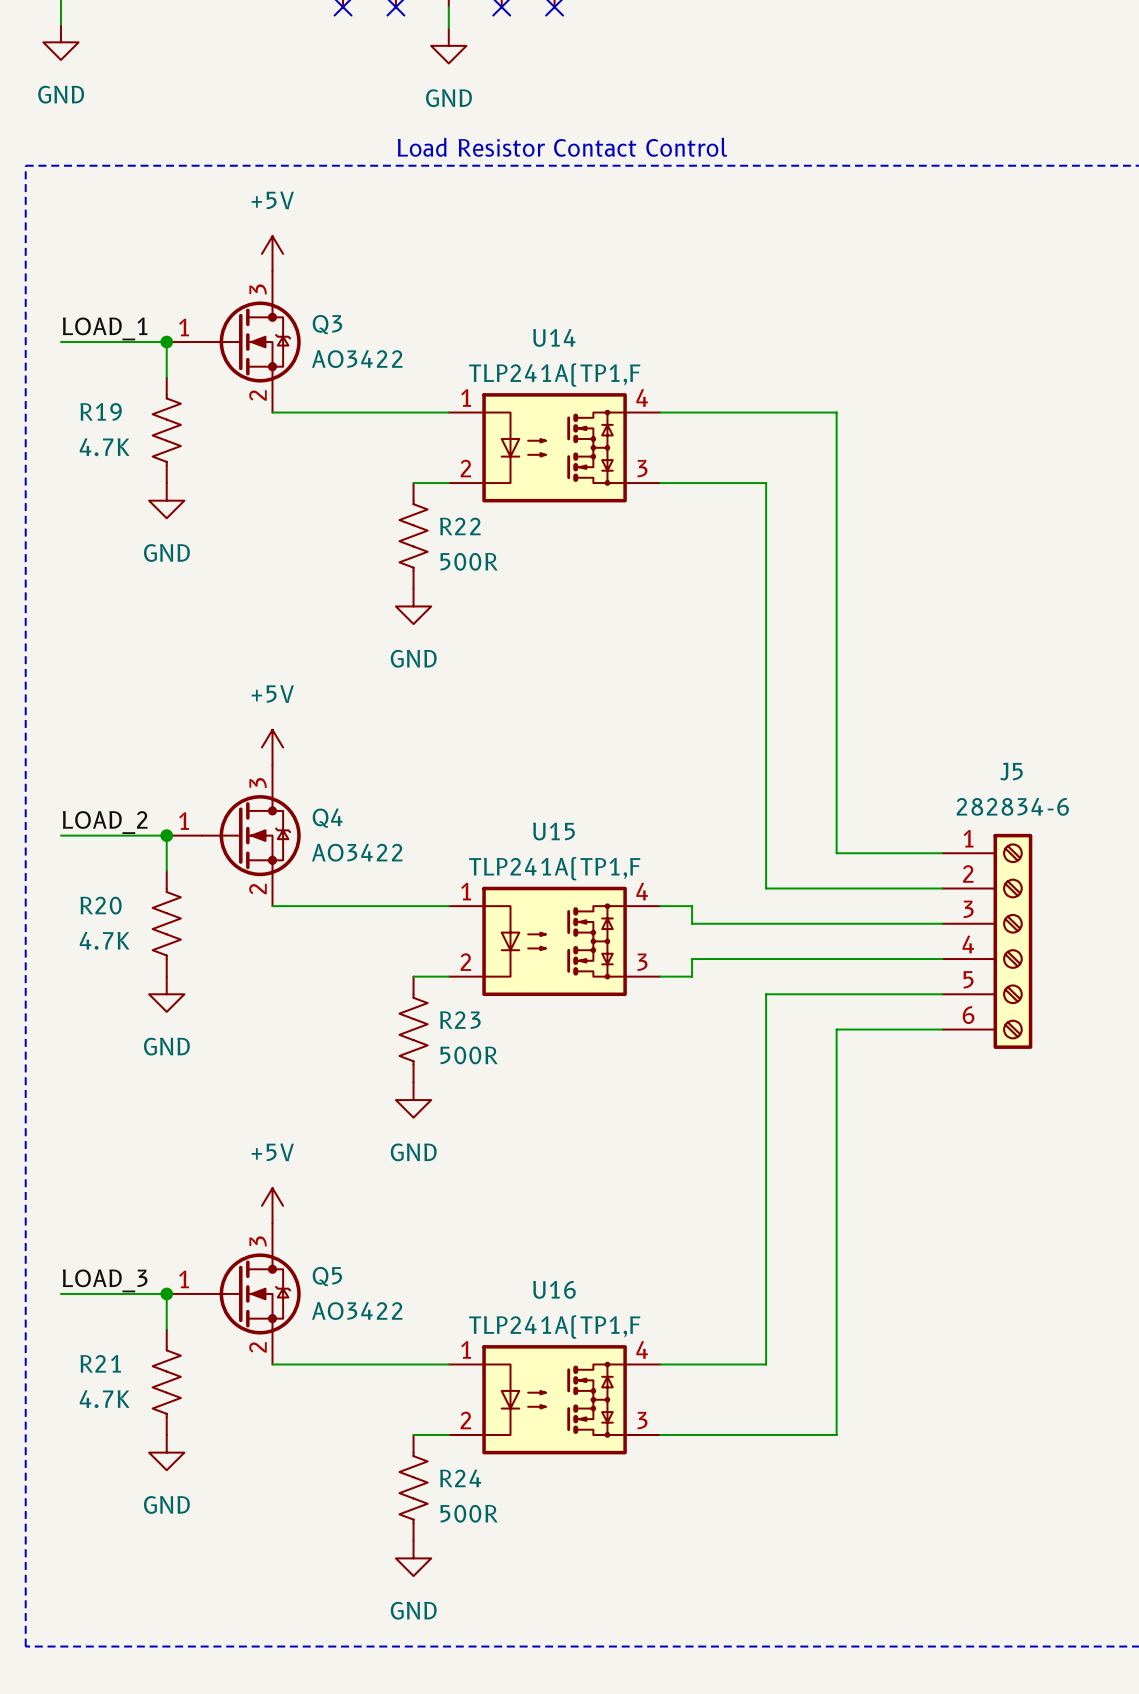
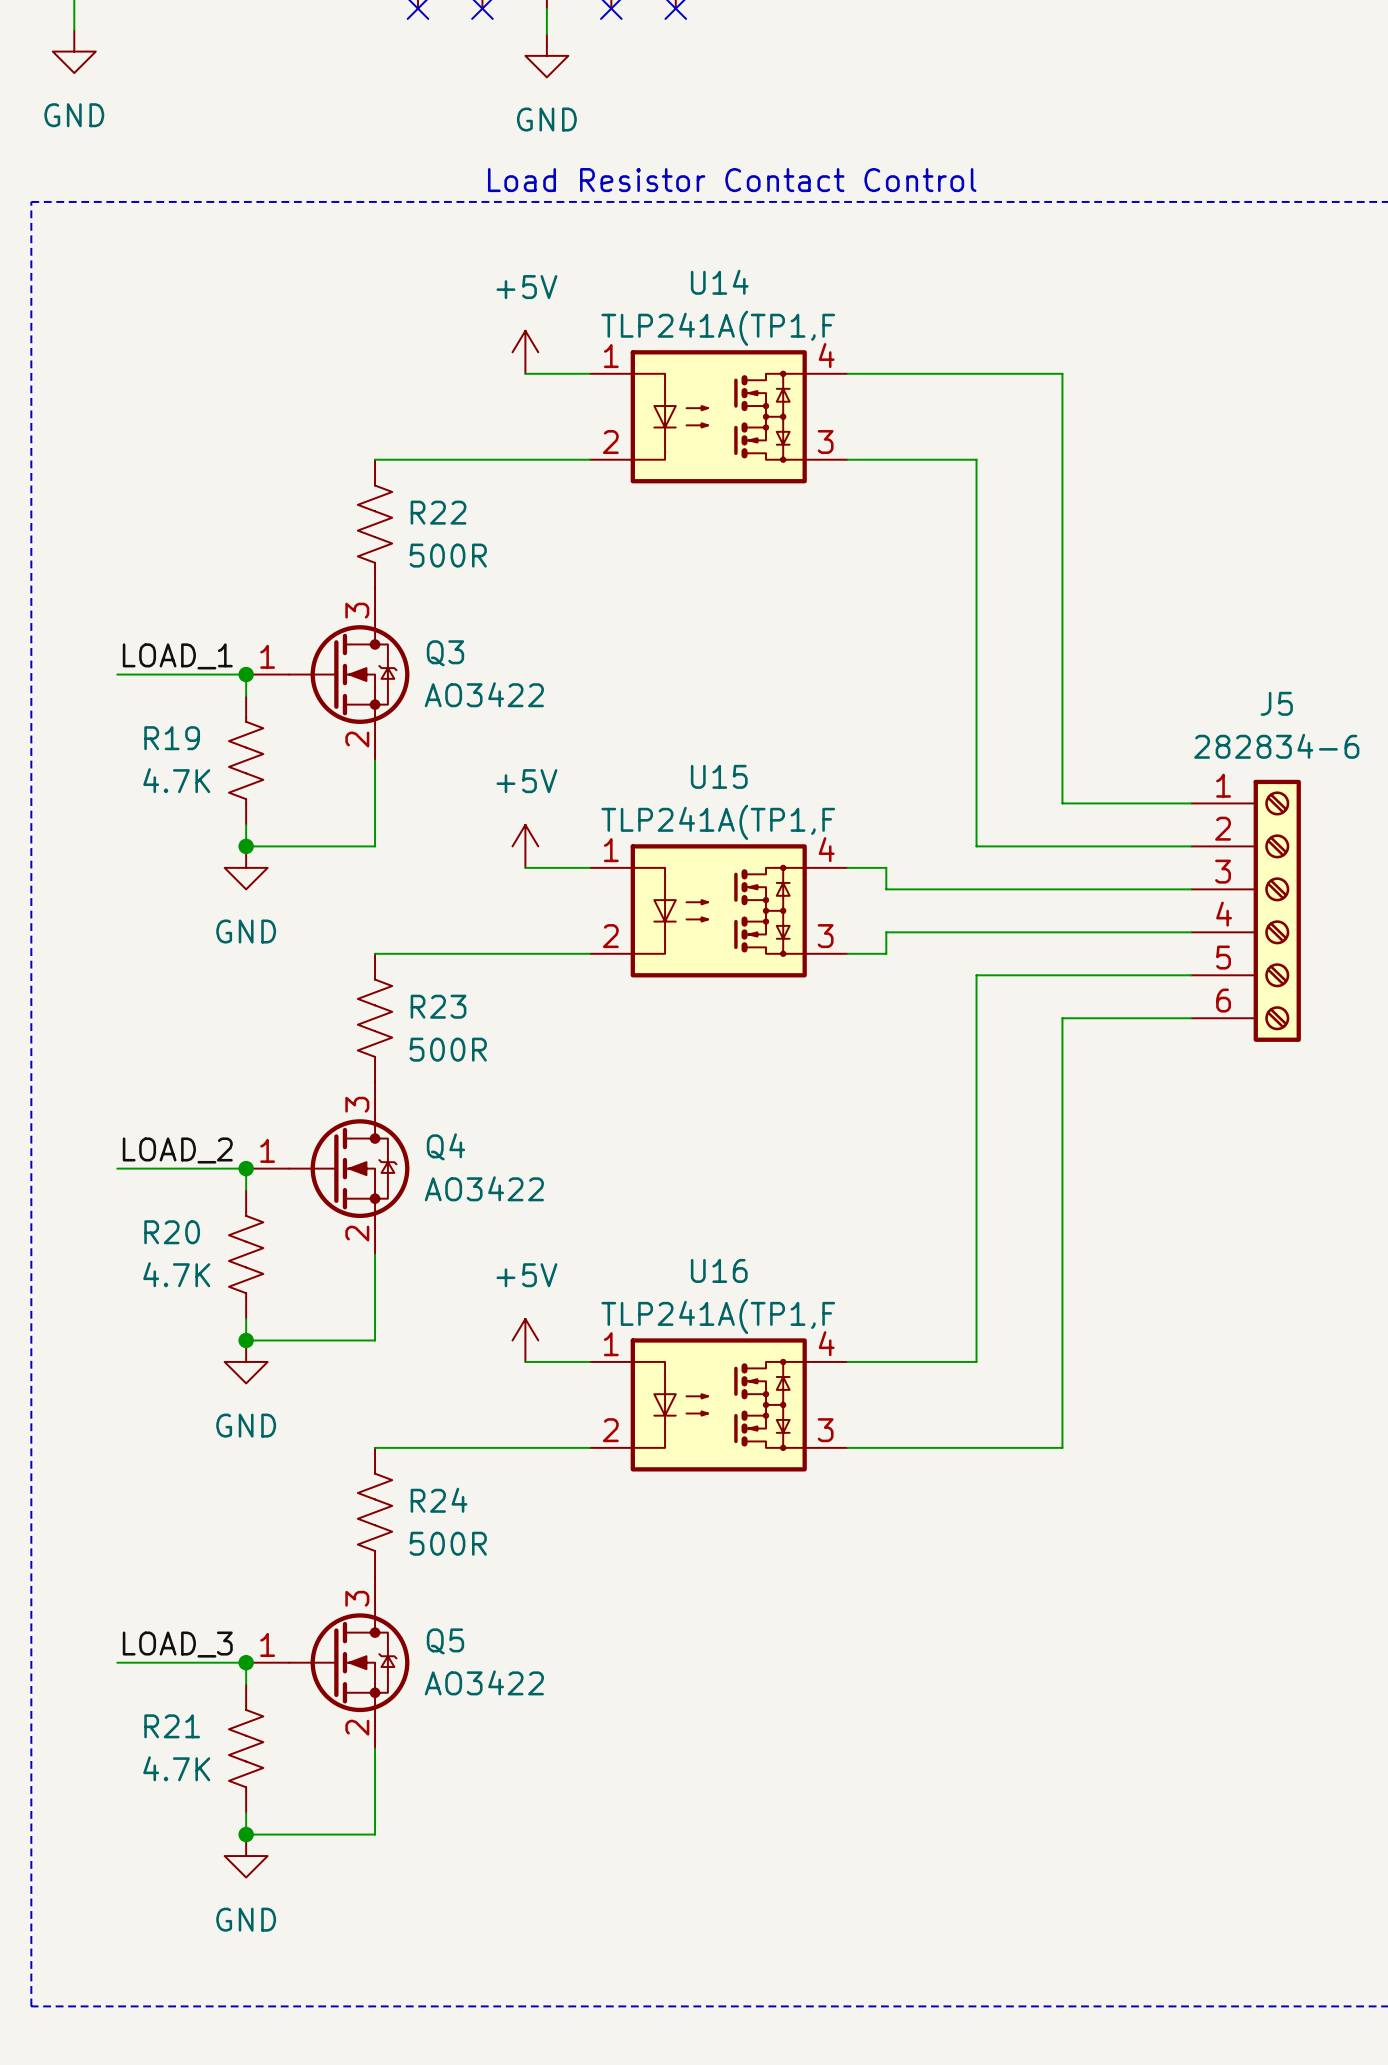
power symbol position: +5V (272, 253) -> +5V (525, 352)
wire: none -> (525, 373) (589, 373)
wire: none -> (847, 373) (1062, 373) (1062, 803) (1191, 803)
label position: LOAD_1 (105, 328) -> LOAD_1 (177, 656)
wire: (60, 342) (166, 342) (166, 377) -> none
junction: (166, 342) -> none
Q3 position: (233, 342) -> (327, 674)
wire: none -> (847, 459) (976, 459) (976, 846) (1191, 846)
wire: (272, 412) (448, 412) -> (375, 459) (589, 459)
wire: (660, 412) (836, 412) (836, 853) (942, 853) -> none
R19 position: (166, 430) -> (246, 760)
U14 position: (554, 447) -> (718, 416)
wire: (413, 483) (448, 483) -> none
wire: (660, 483) (766, 483) (766, 888) (942, 888) -> none
power symbol: GND (166, 500) -> none
R22 position: (413, 535) -> (375, 524)
wire: none -> (117, 674) (246, 674) (246, 696)
junction: none -> (246, 674)
power symbol: GND (413, 606) -> none
wire: none -> (375, 760) (375, 846) (246, 846) (246, 824)
junction: none -> (246, 846)
power symbol: none -> GND (246, 867)
wire: none -> (525, 867) (589, 867)
power symbol position: +5V (272, 747) -> +5V (525, 846)
wire: none -> (1191, 975) (976, 975) (976, 1361) (847, 1361)
label position: LOAD_2 (105, 822) -> LOAD_2 (177, 1150)
wire: (60, 835) (166, 835) (166, 870) -> none
junction: (166, 835) -> none
Q4 position: (233, 835) -> (327, 1168)
wire: none -> (1191, 1018) (1062, 1018) (1062, 1447) (847, 1447)
wire: (272, 906) (448, 906) -> (375, 953) (589, 953)
wire: (660, 906) (692, 906) (692, 923) (942, 923) -> (847, 867) (886, 867) (886, 889) (1191, 889)
R20 position: (166, 923) -> (246, 1254)
U15 position: (554, 941) -> (718, 910)
J5 position: (987, 941) -> (1246, 910)
wire: none -> (117, 1168) (246, 1168) (246, 1190)
junction: none -> (246, 1168)
wire: (942, 959) (692, 959) (692, 976) (660, 976) -> (1191, 932) (886, 932) (886, 953) (847, 953)
wire: (413, 976) (448, 976) -> none
power symbol: GND (166, 994) -> none
wire: (942, 994) (766, 994) (766, 1364) (660, 1364) -> none
wire: none -> (375, 1254) (375, 1340) (246, 1340) (246, 1318)
R23 position: (413, 1029) -> (375, 1018)
wire: (942, 1029) (836, 1029) (836, 1434) (660, 1434) -> none
junction: none -> (246, 1340)
power symbol: GND (413, 1100) -> none
power symbol: none -> GND (246, 1361)
wire: none -> (525, 1361) (589, 1361)
power symbol position: +5V (272, 1205) -> +5V (525, 1340)
label position: LOAD_3 (105, 1280) -> LOAD_3 (177, 1644)
wire: (60, 1293) (166, 1293) (166, 1329) -> none
junction position: (166, 1293) -> (246, 1662)
Q5 position: (233, 1293) -> (327, 1662)
wire: none -> (117, 1662) (246, 1662) (246, 1684)
wire: (272, 1364) (448, 1364) -> (375, 1447) (589, 1447)
R21 position: (166, 1382) -> (246, 1748)
U16 position: (554, 1399) -> (718, 1404)
wire: none -> (375, 1748) (375, 1834) (246, 1834) (246, 1813)
wire: (413, 1434) (448, 1434) -> none
power symbol position: GND (166, 1452) -> GND (246, 1856)
R24 position: (413, 1487) -> (375, 1512)
junction: none -> (246, 1834)
power symbol: GND (413, 1558) -> none

